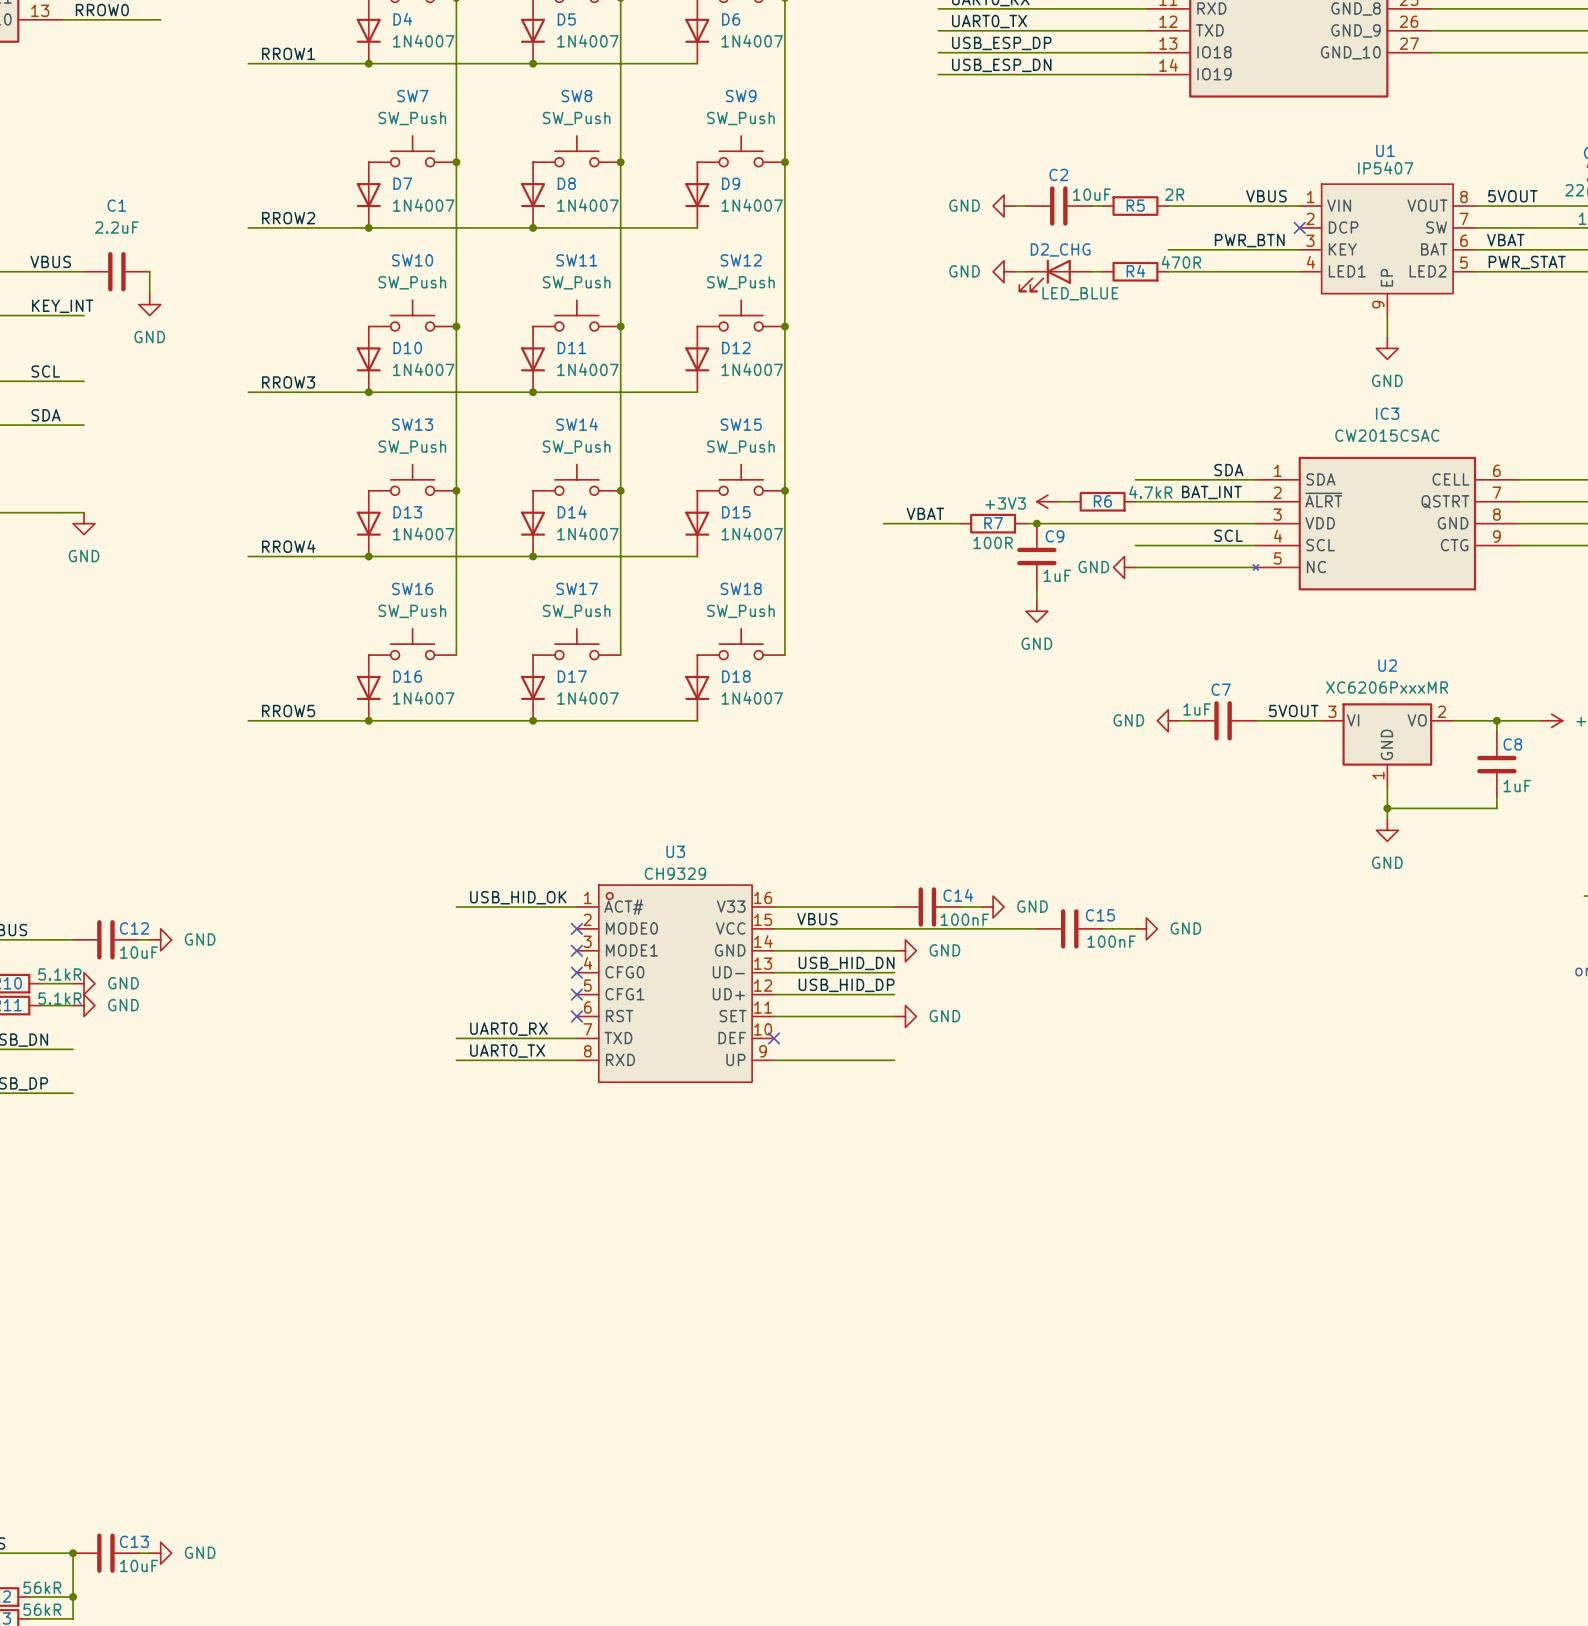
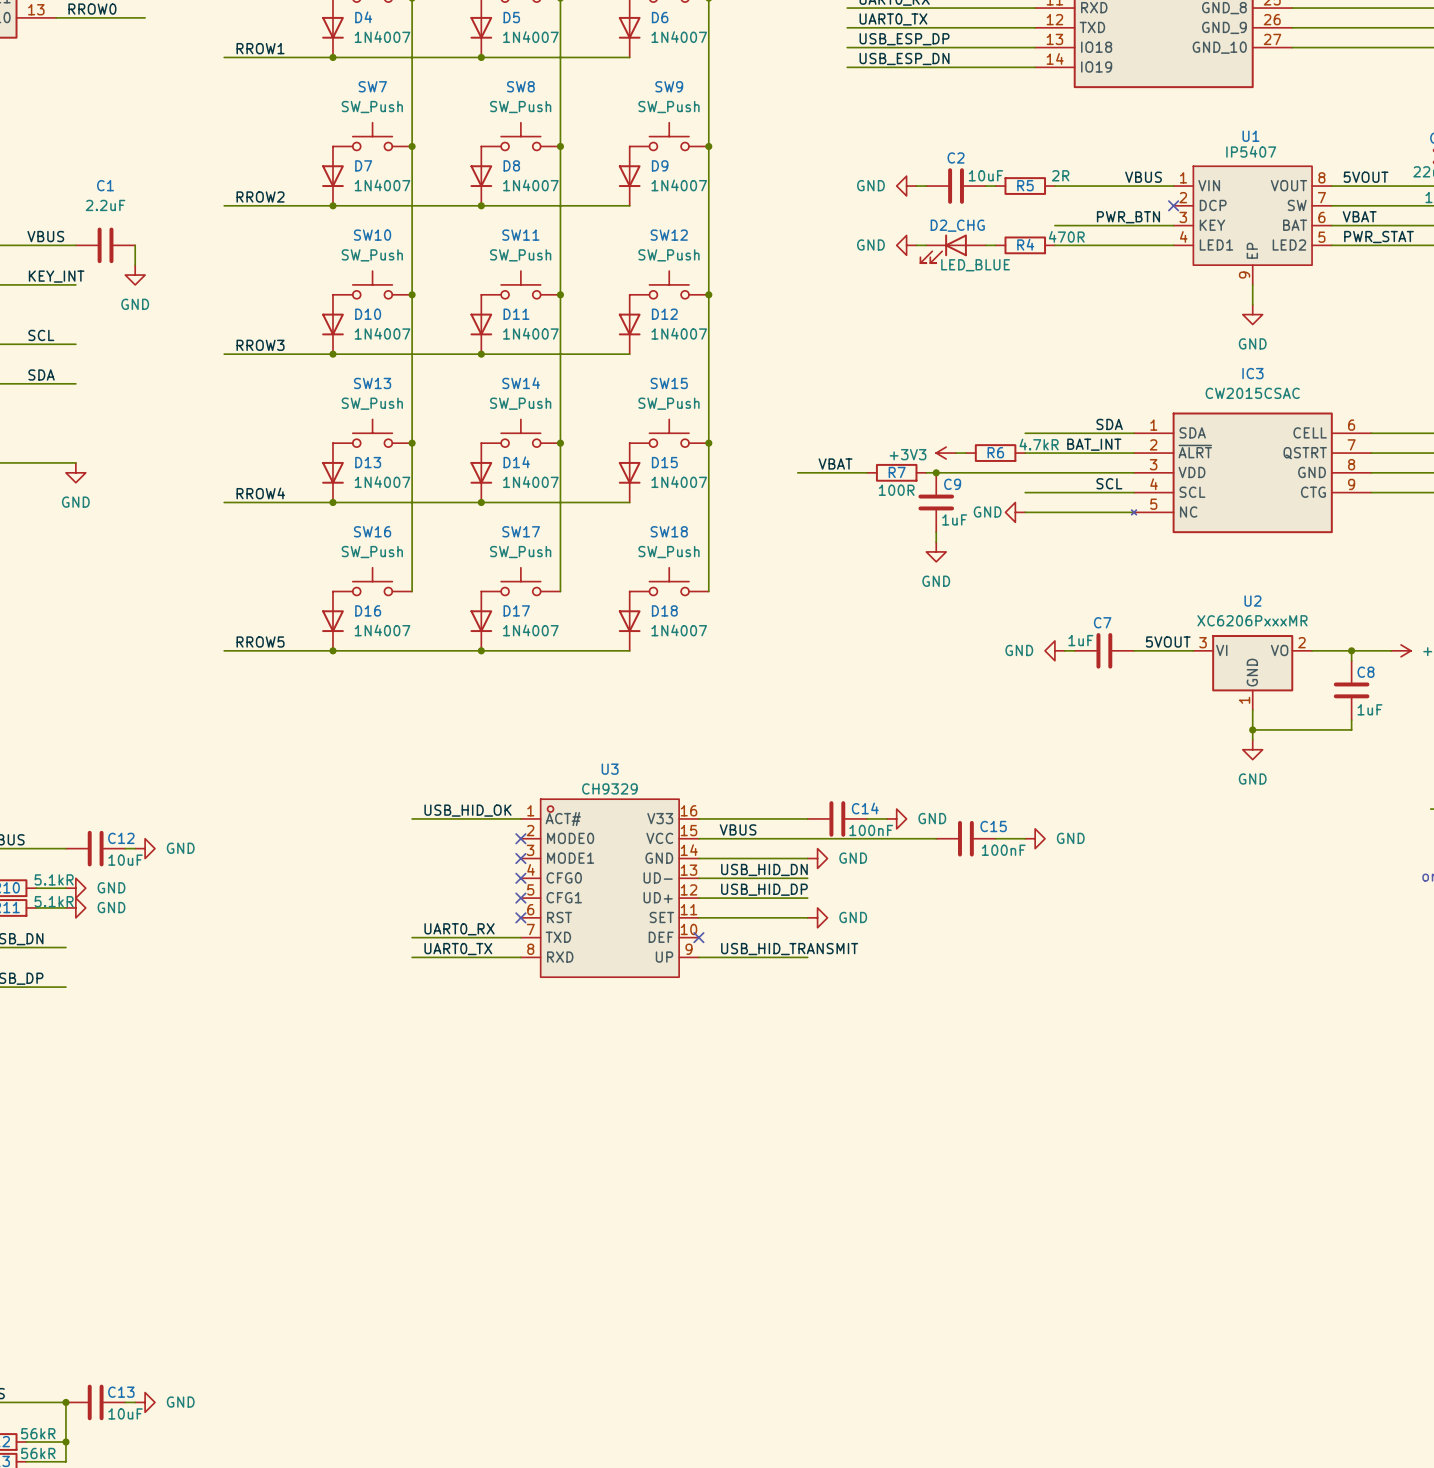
label: none -> USB_HID_TRANSMIT (789, 949)

